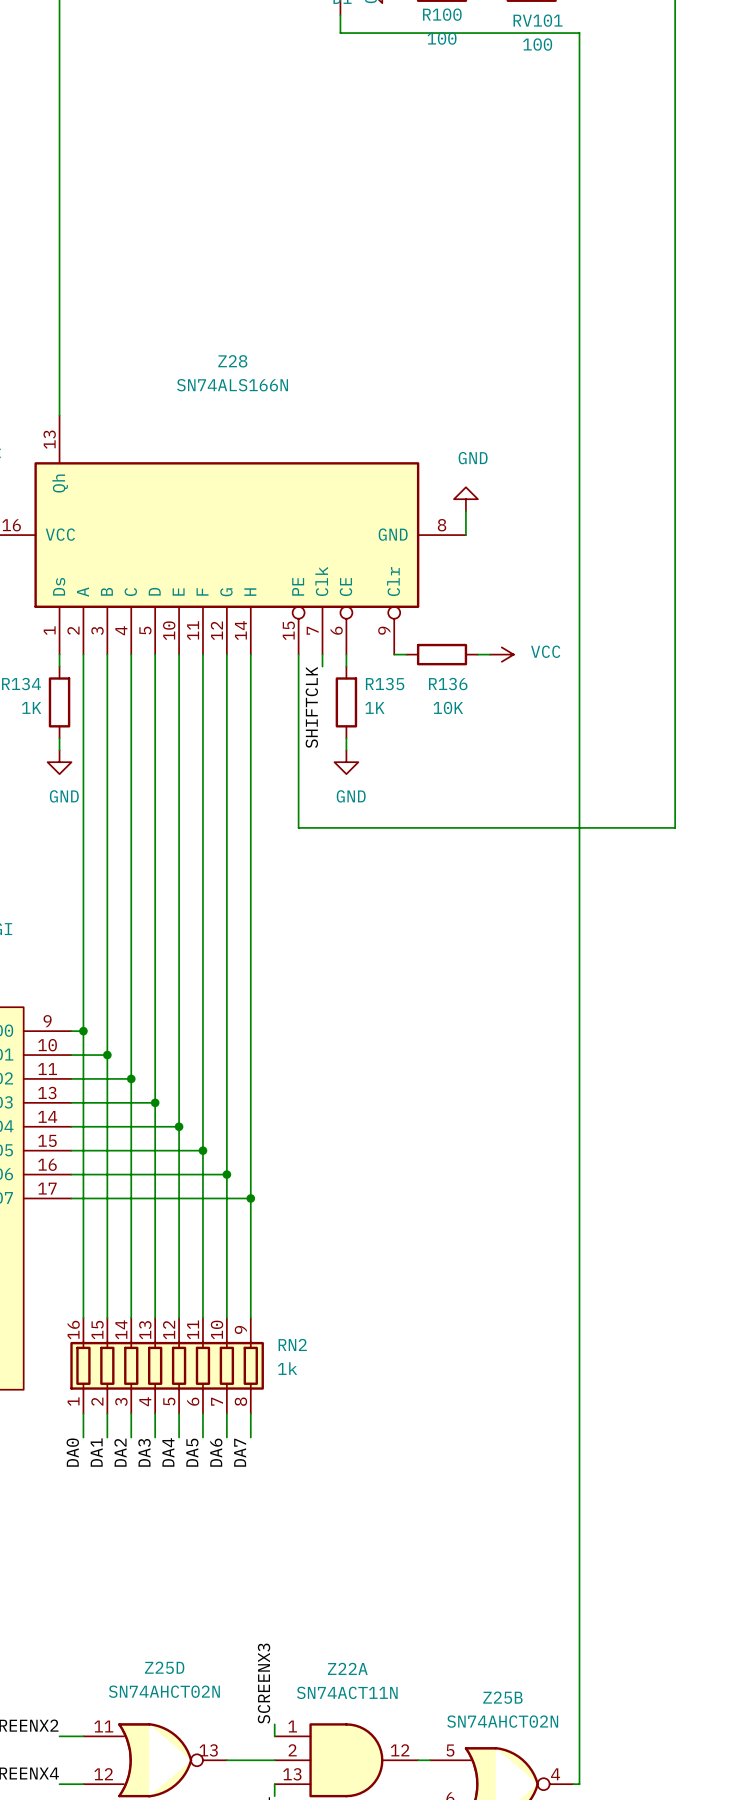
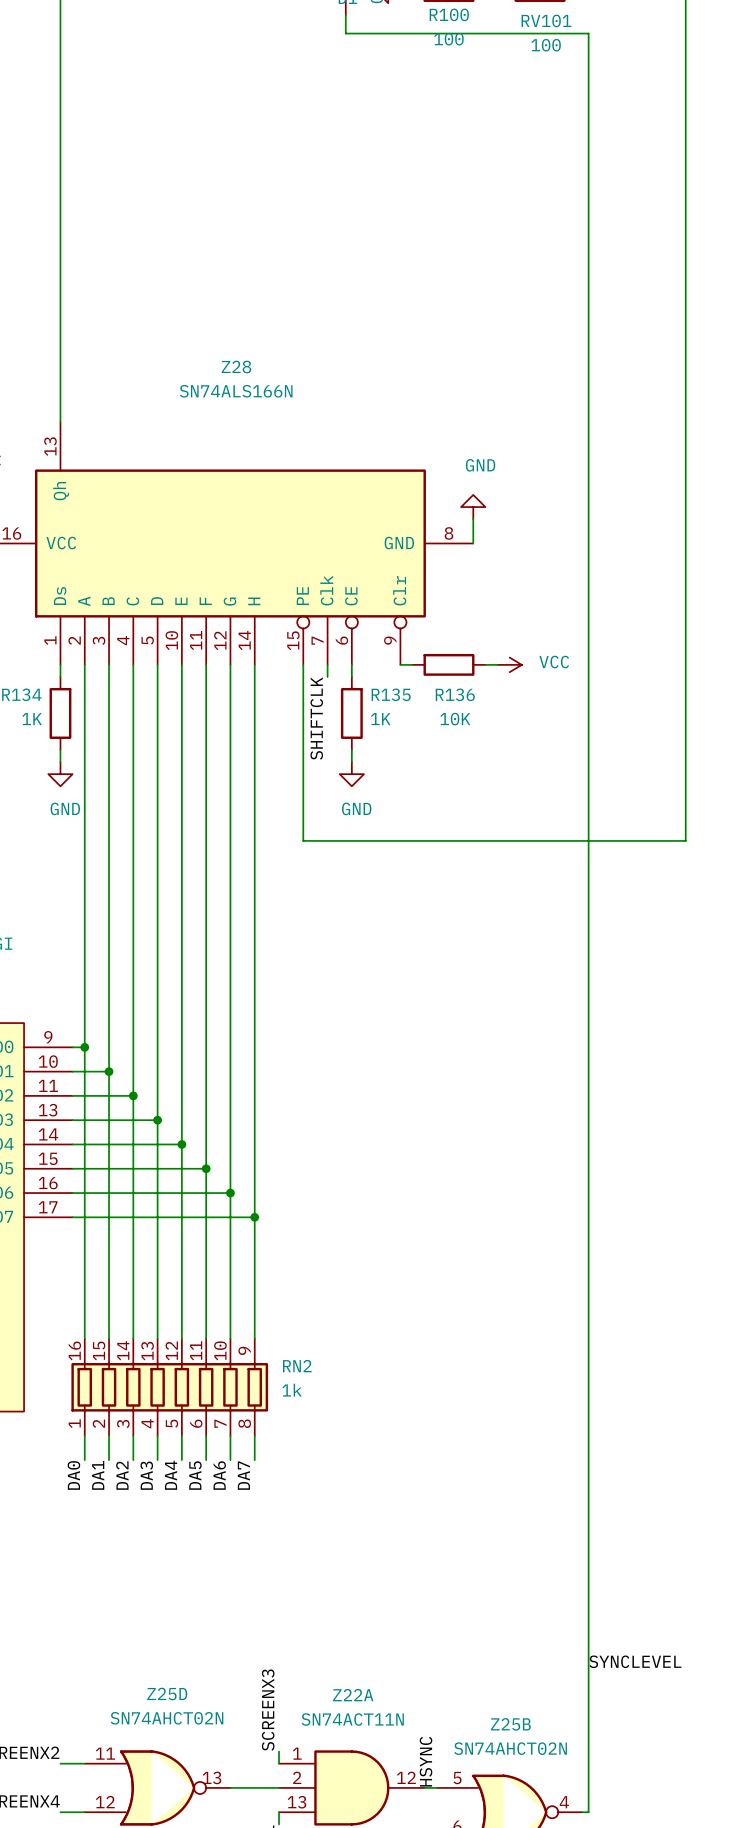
label: none -> SYNCLEVEL (635, 1661)
label: none -> HSYNC (426, 1761)

